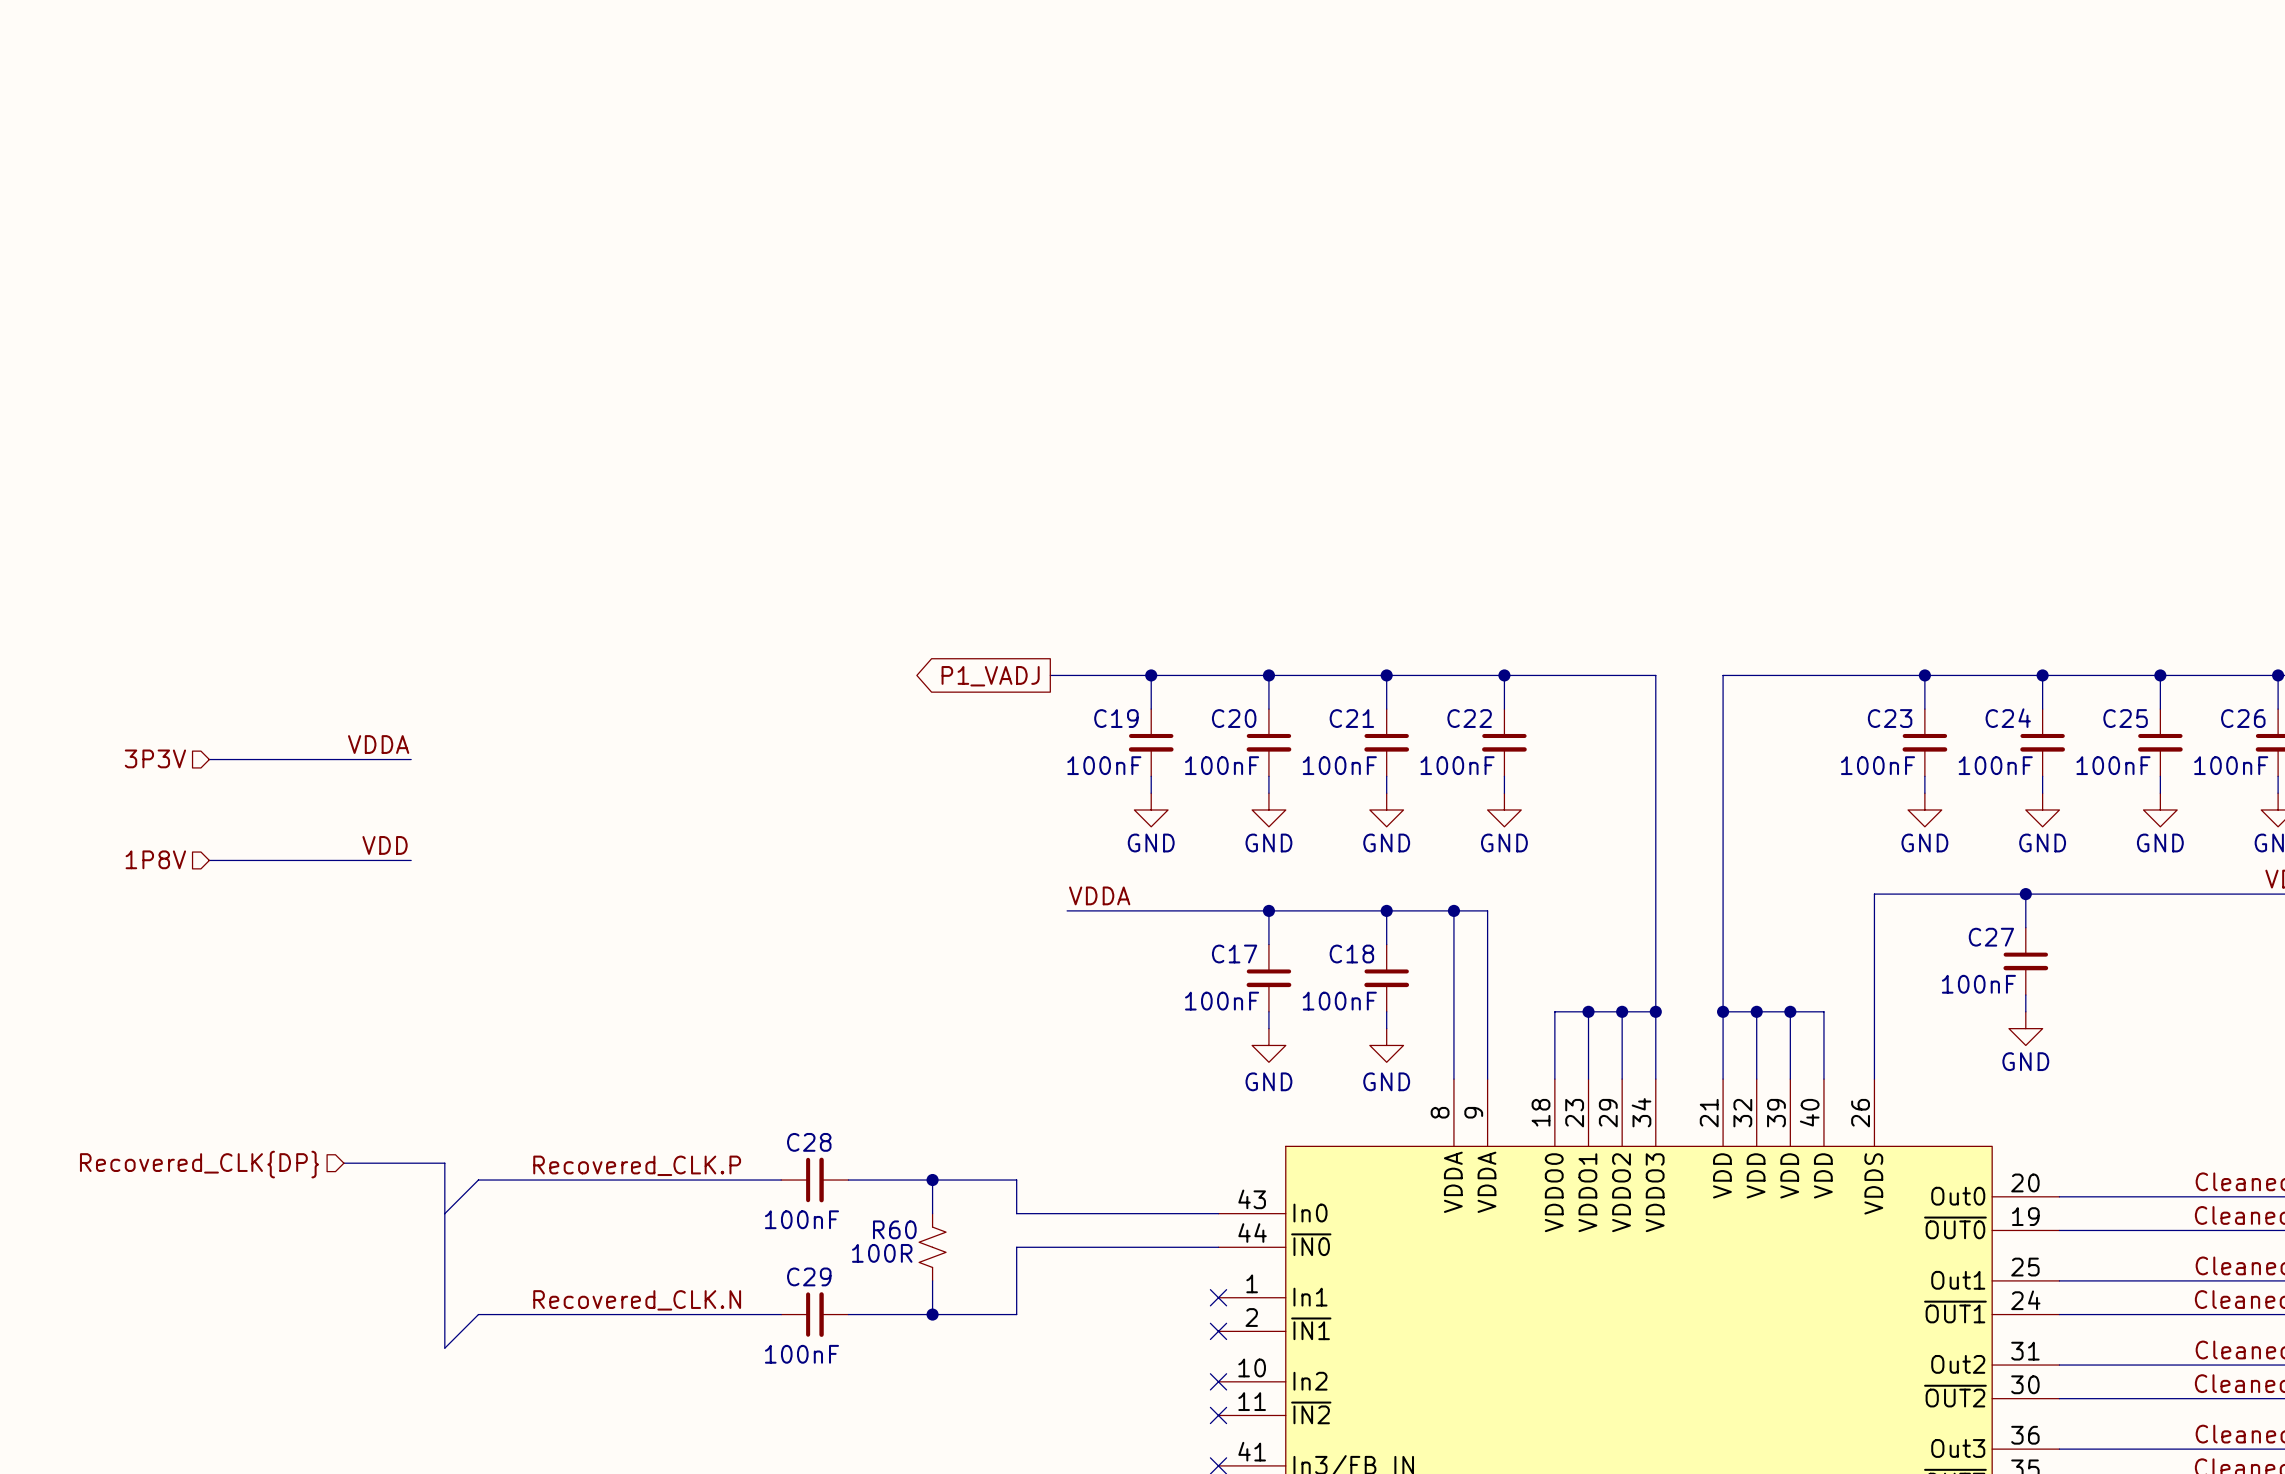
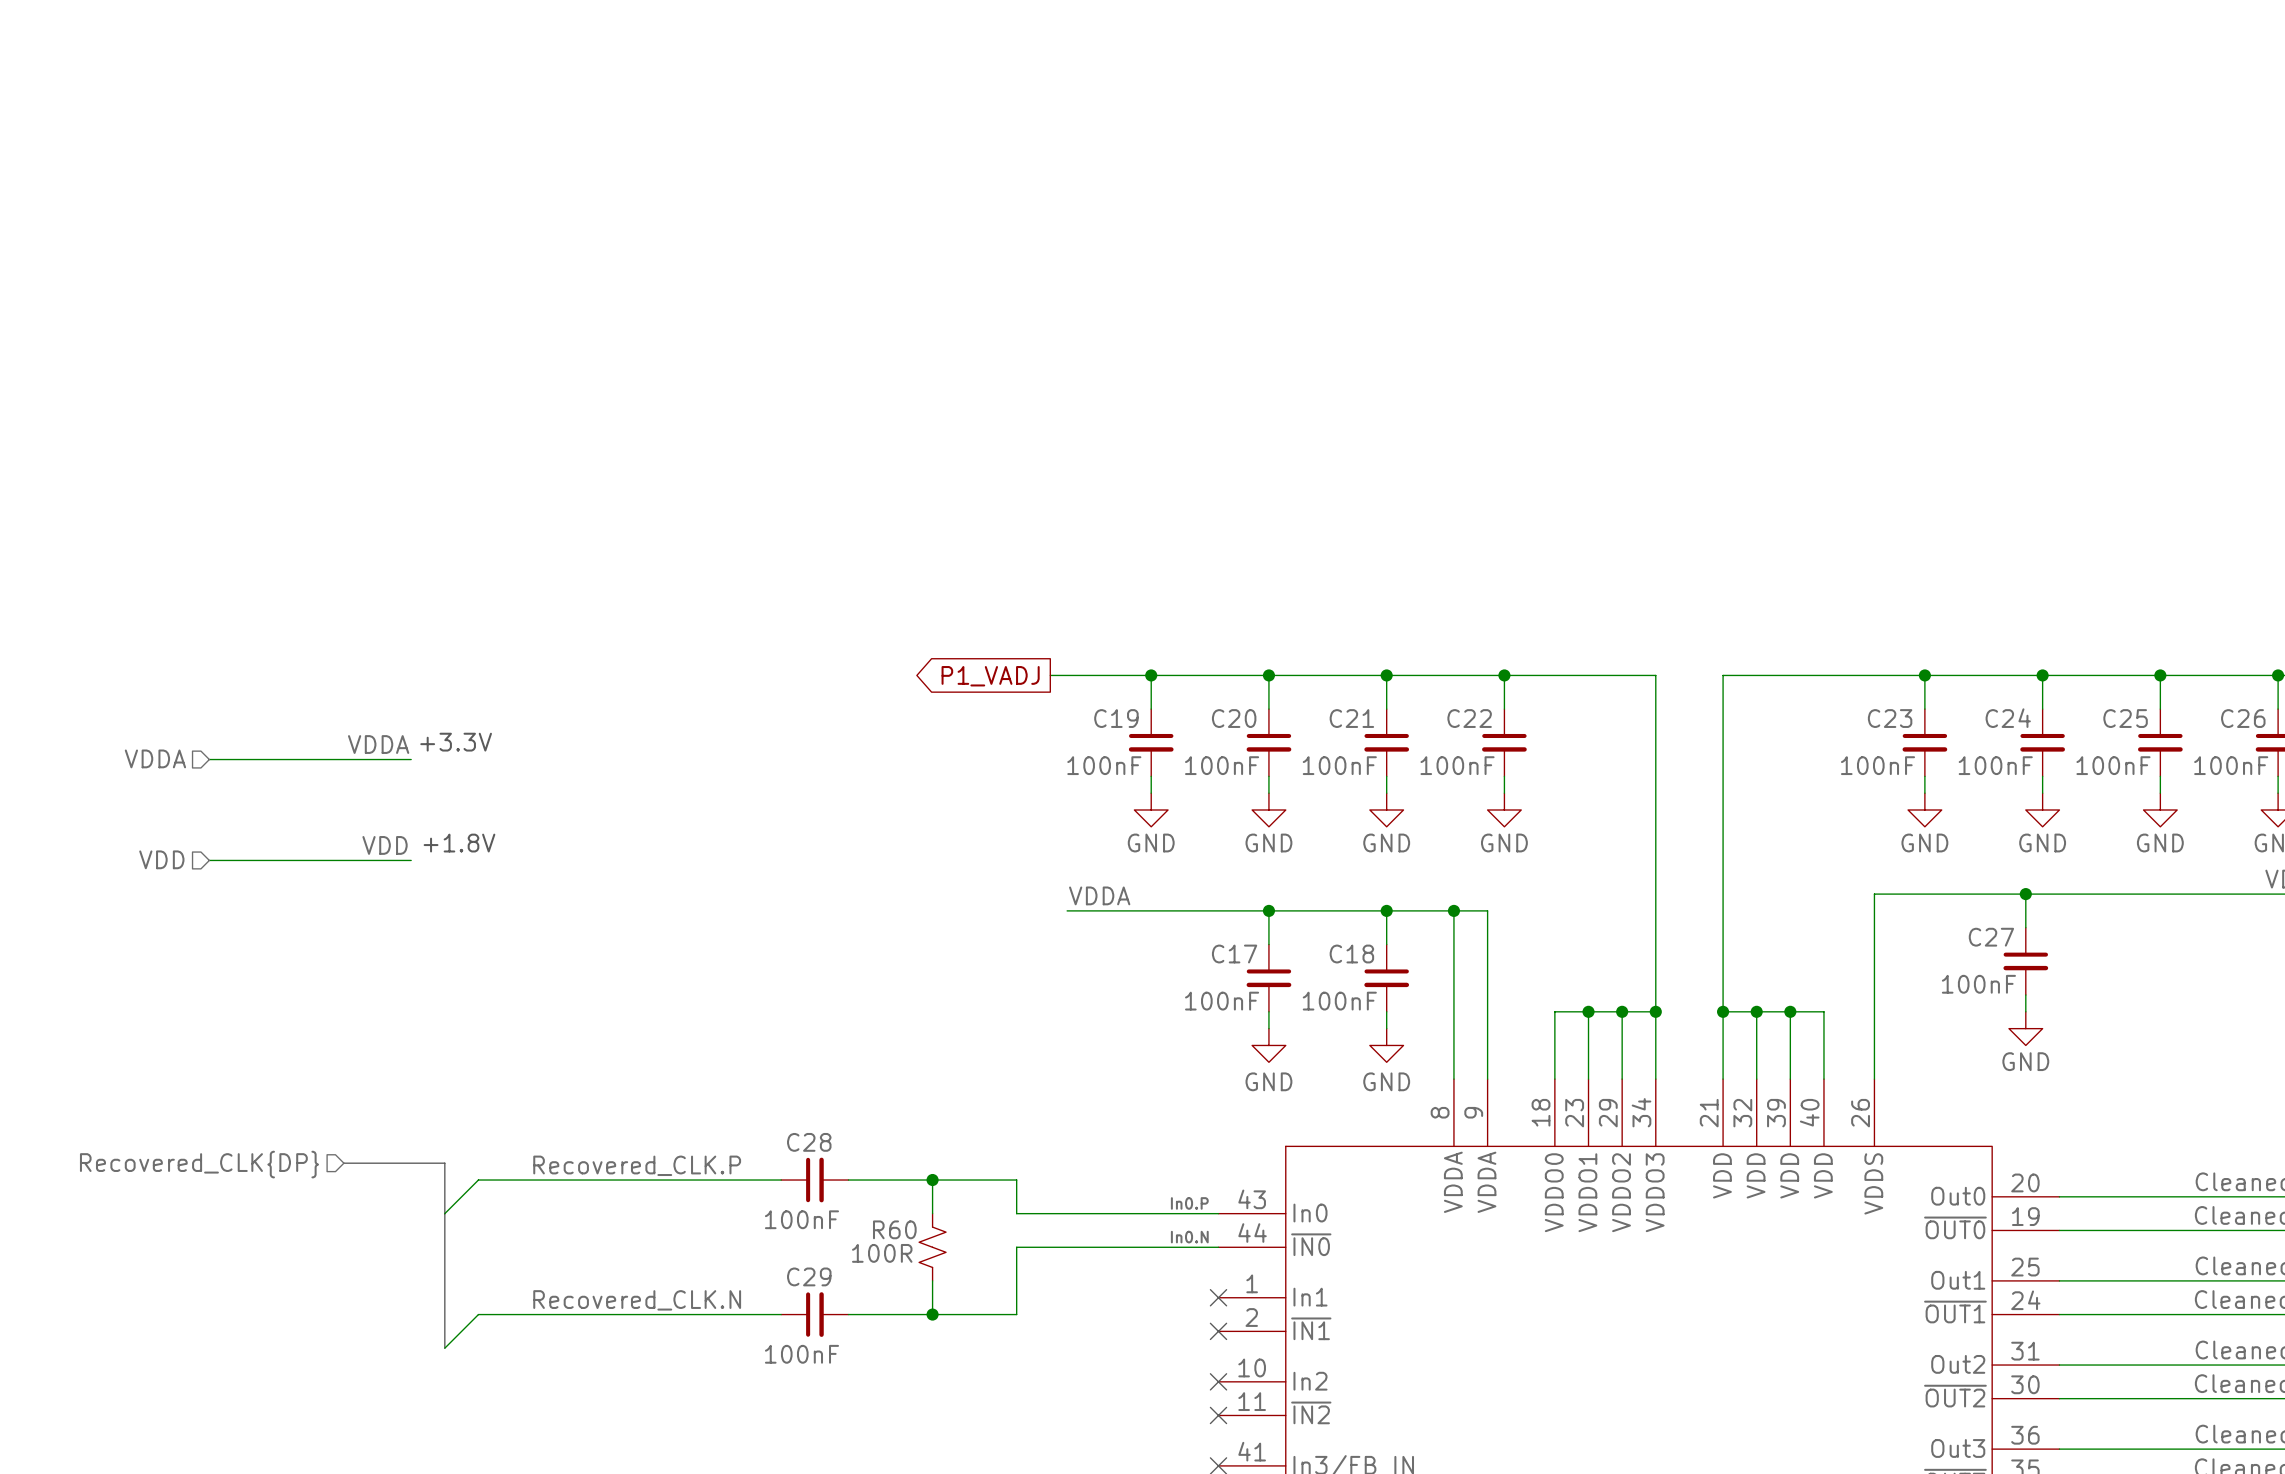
text: none -> +3.3V (456, 742)
hierarchical label: 3P3V (155, 758) -> VDDA (155, 758)
text: none -> +1.8V (459, 843)
hierarchical label: 1P8V (155, 859) -> VDD (161, 859)
label: none -> In0.P (1189, 1203)
label: none -> In0.N (1189, 1237)

